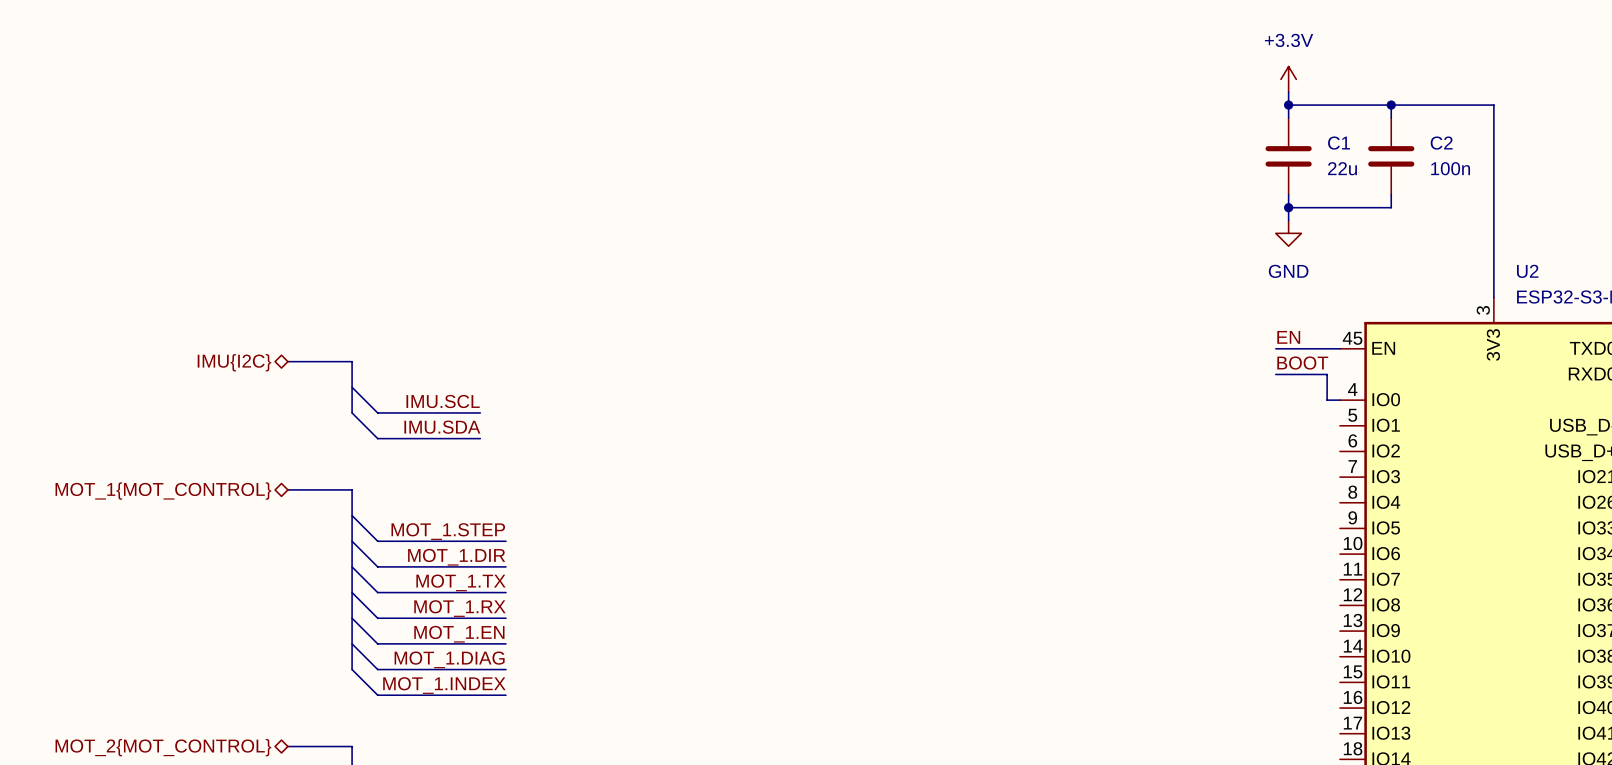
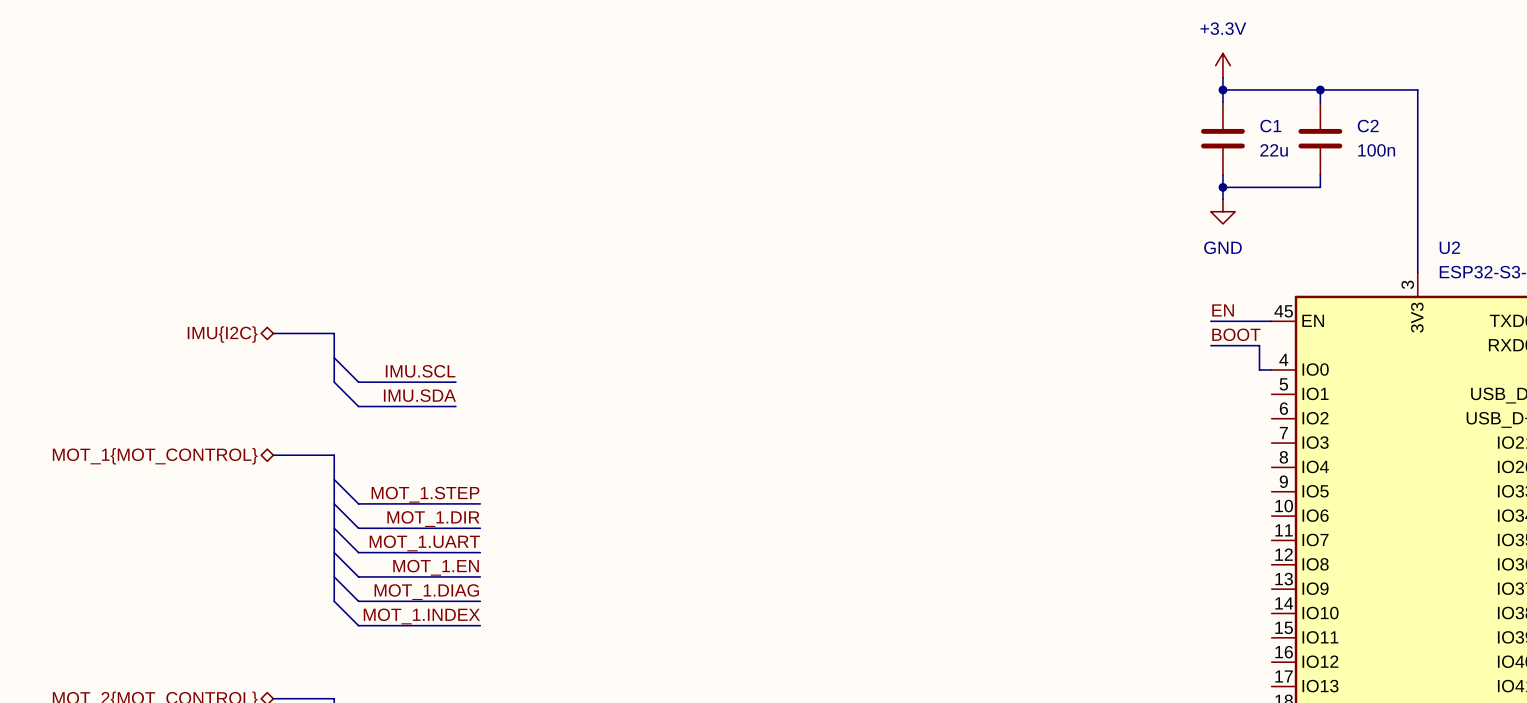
label: MOT_1.TX (461, 582) -> MOT_1.UART (424, 543)
label: MOT_1.RX (459, 608) -> MOT_1.EN (436, 567)
label: MOT_1.EN (459, 634) -> MOT_1.DIAG (426, 592)
bus: (352, 643) (352, 669) -> none
label: MOT_1.DIAG (449, 659) -> MOT_1.INDEX (421, 616)
wire: (352, 669) (377, 695) (506, 695) -> none
label: MOT_1.INDEX (444, 685) -> none

